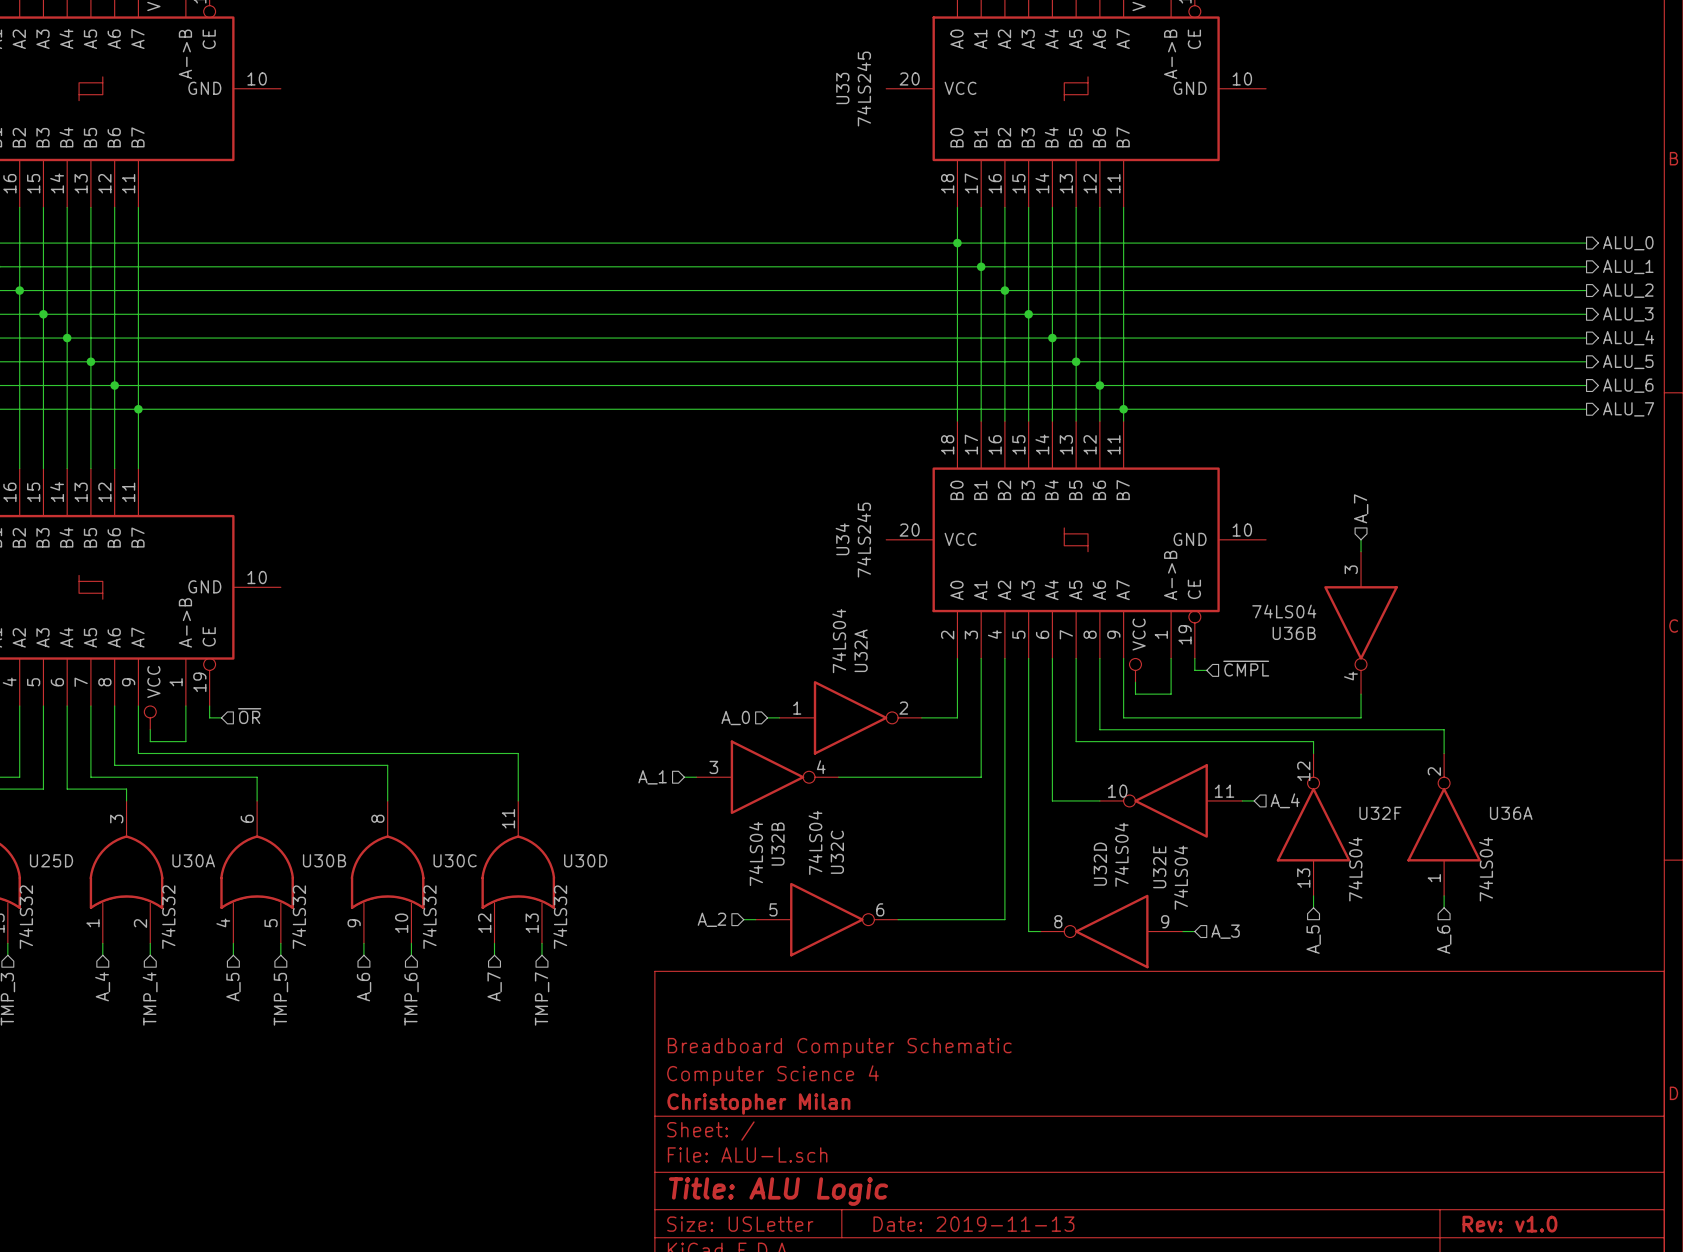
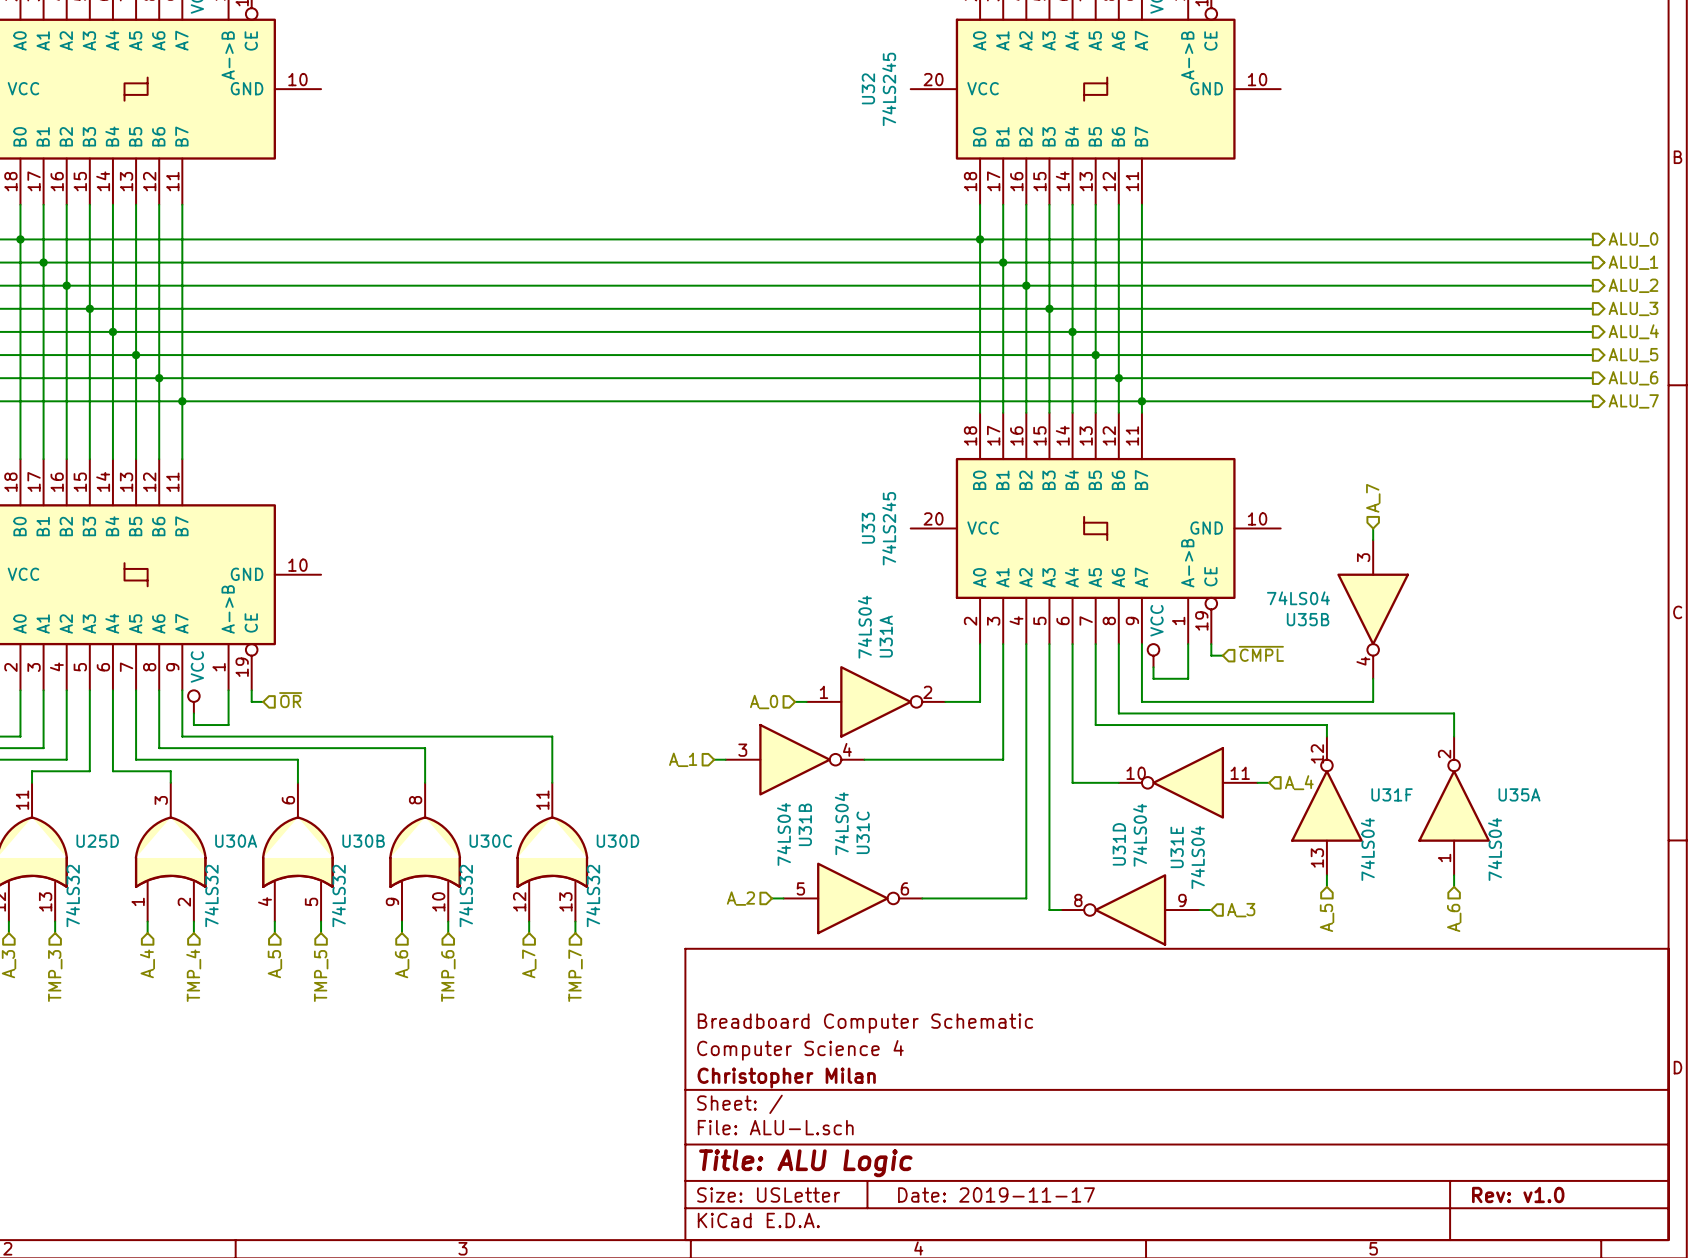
U33 name: U33 (842, 88) -> U32 (868, 88)
U34 name: U34 (842, 539) -> U33 (868, 528)
U36B name: U36B (1294, 633) -> U35B (1308, 619)
U32A name: U32A (861, 650) -> U31A (886, 636)
U32F name: U32F (1380, 813) -> U31F (1392, 794)
U36A name: U36A (1511, 813) -> U35A (1519, 794)
U32B name: U32B (777, 844) -> U31B (805, 824)
U32C name: U32C (837, 852) -> U31C (863, 832)
U32D name: U32D (1100, 864) -> U31D (1119, 844)
U32E name: U32E (1159, 867) -> U31E (1177, 847)
title block: Date: 2019-11-13 (973, 1224) -> Date: 2019-11-17 (996, 1194)

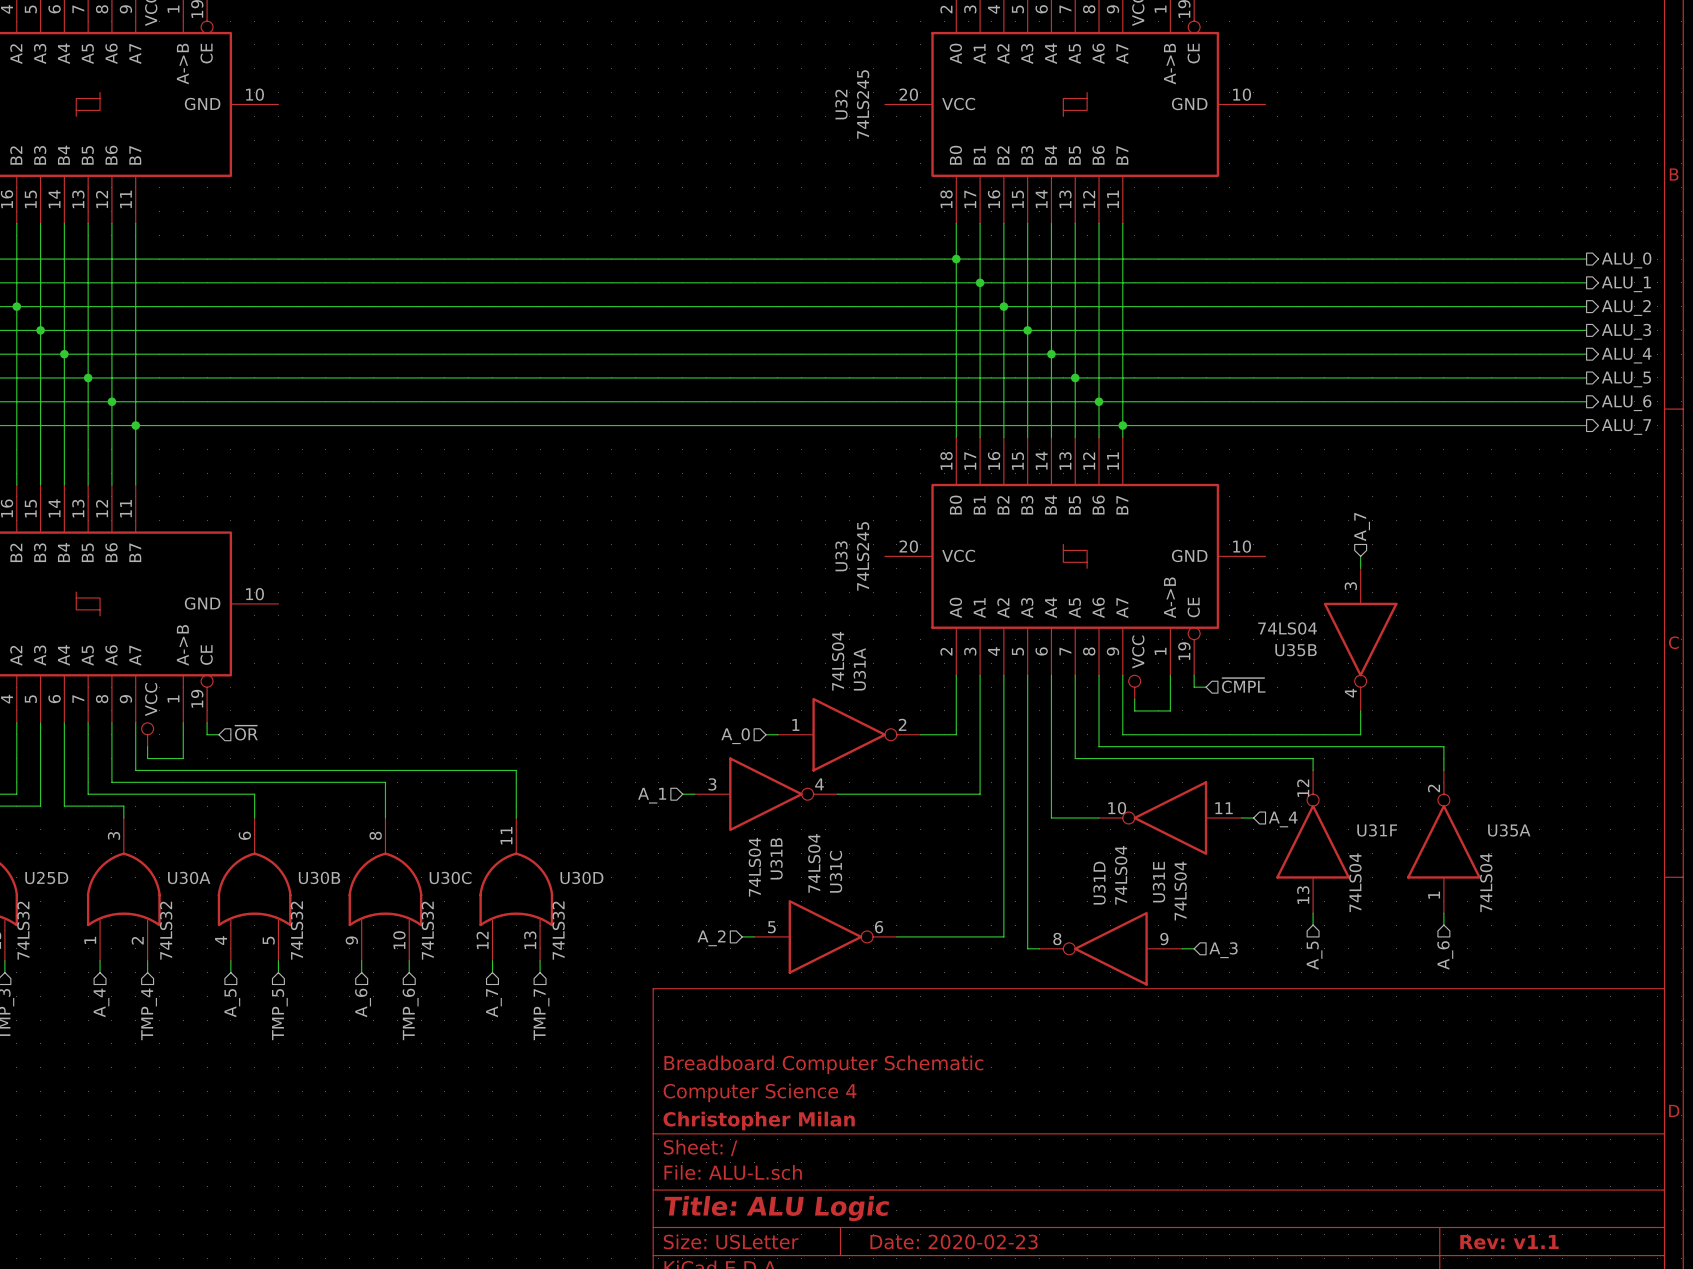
title block: Date: 2019-11-17 (996, 1194) -> Date: 2020-02-23 (954, 1241)
title block: Rev: v1.0 (1518, 1194) -> Rev: v1.1 (1509, 1242)

